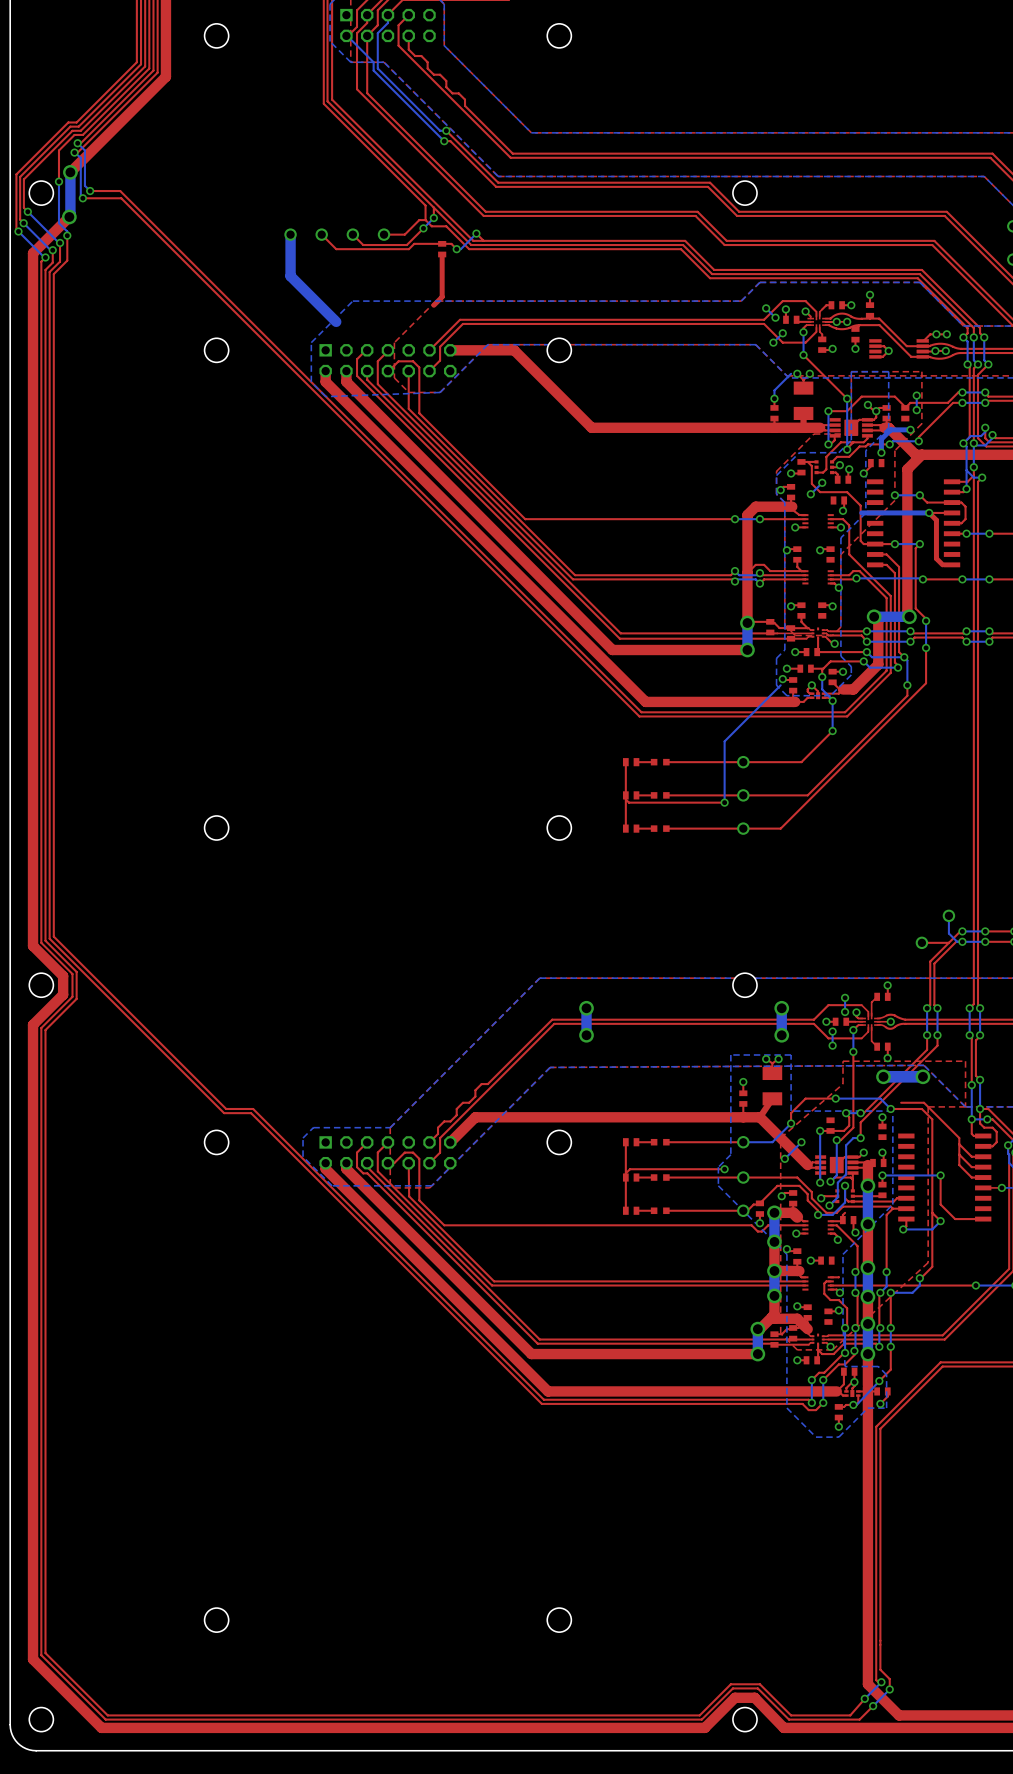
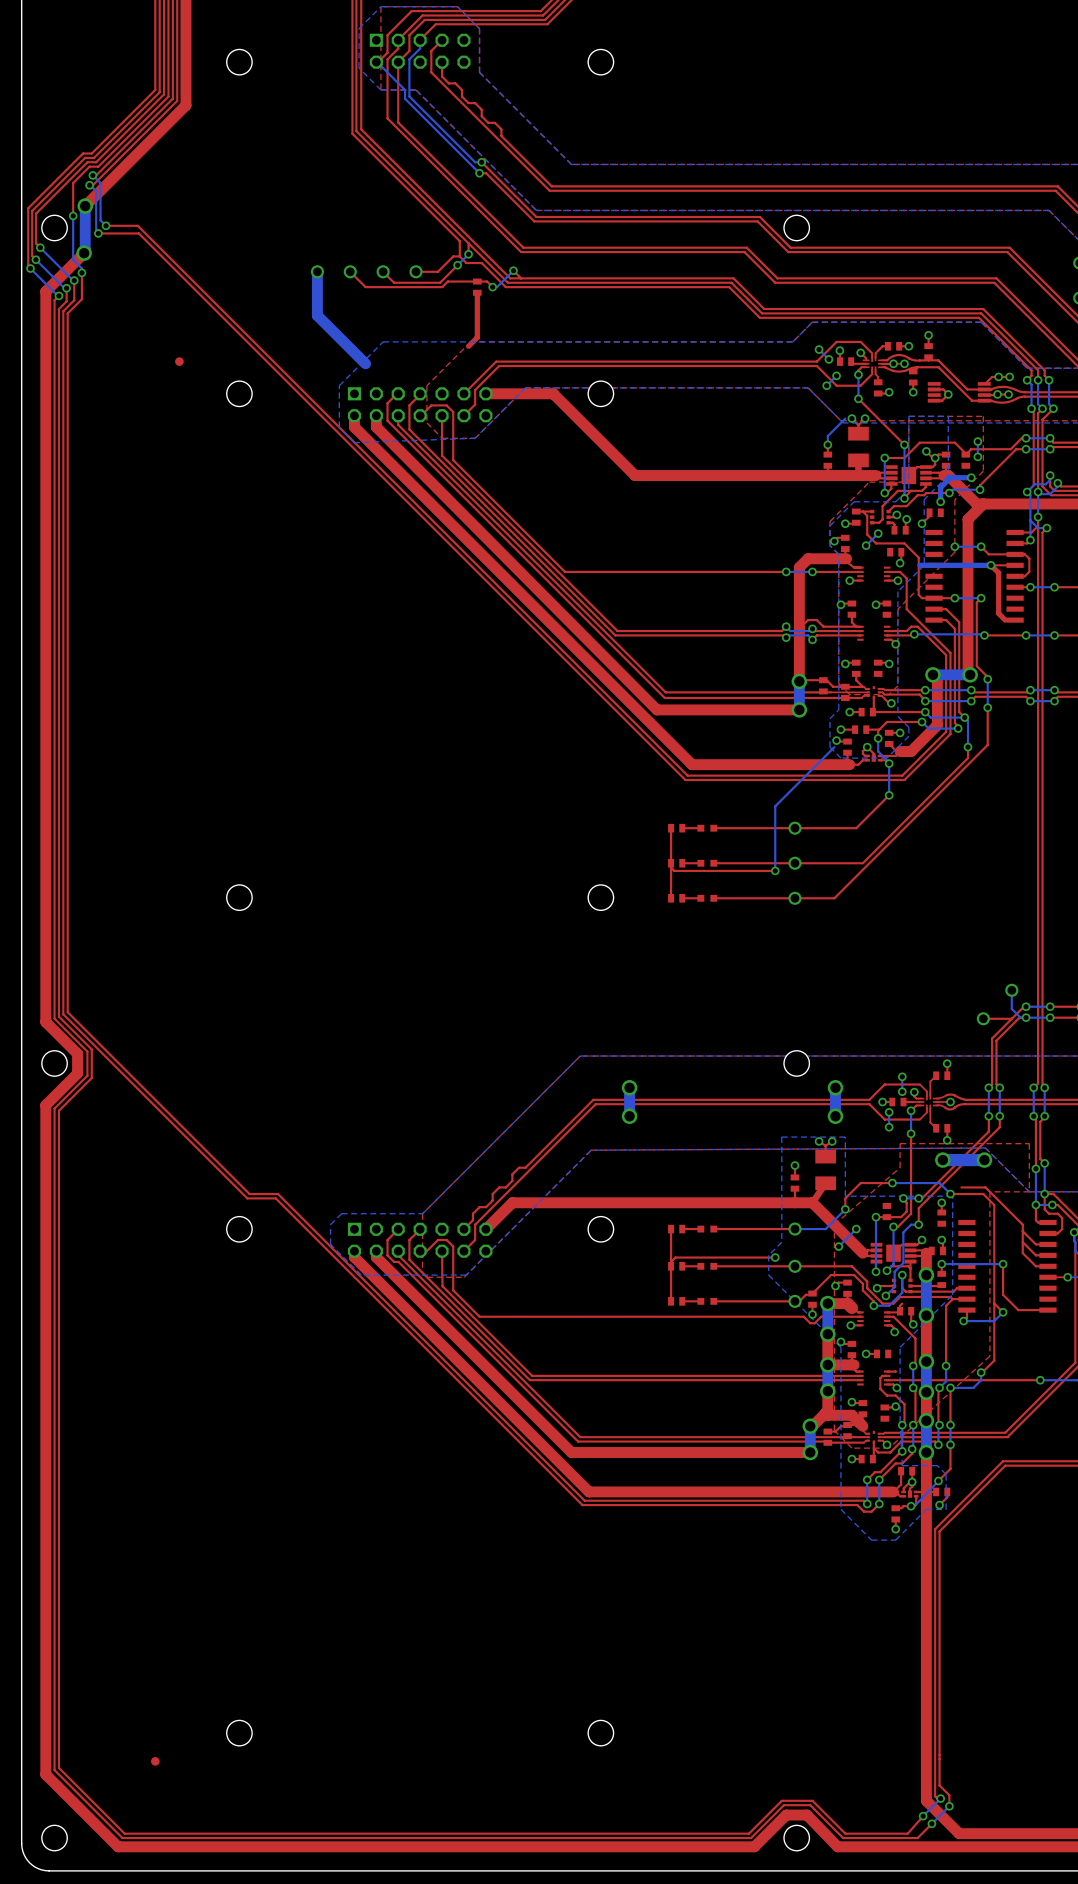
part: none -> (179, 361)
part: none -> (155, 1761)

